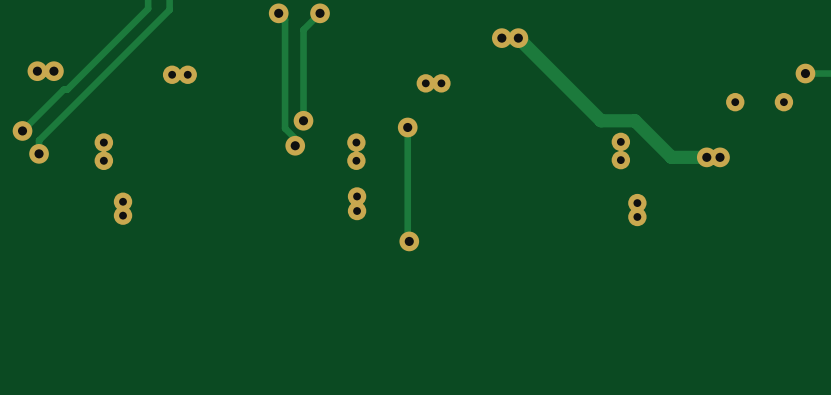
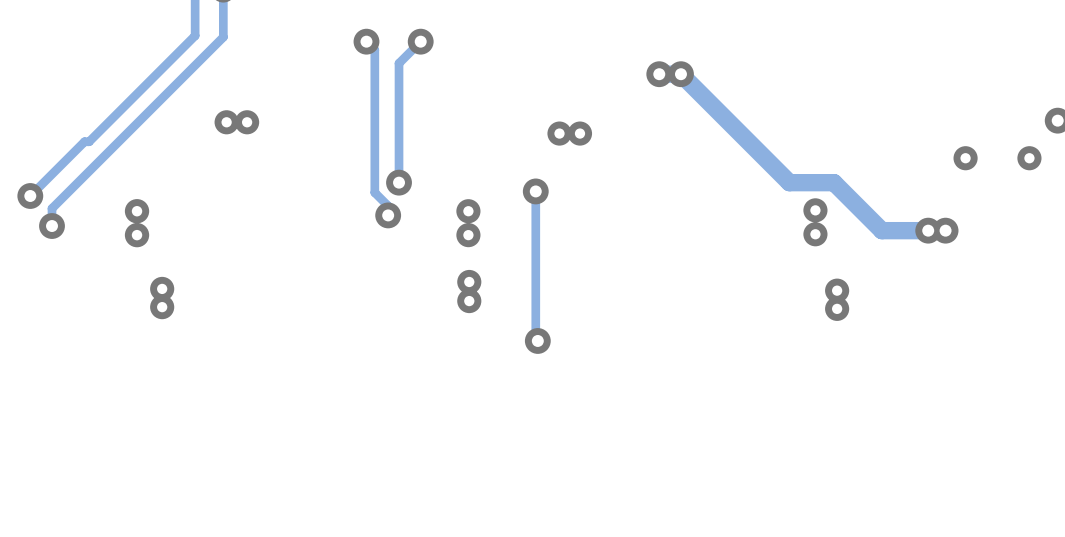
via: (37, 71) -> none
via: (53, 71) -> none

